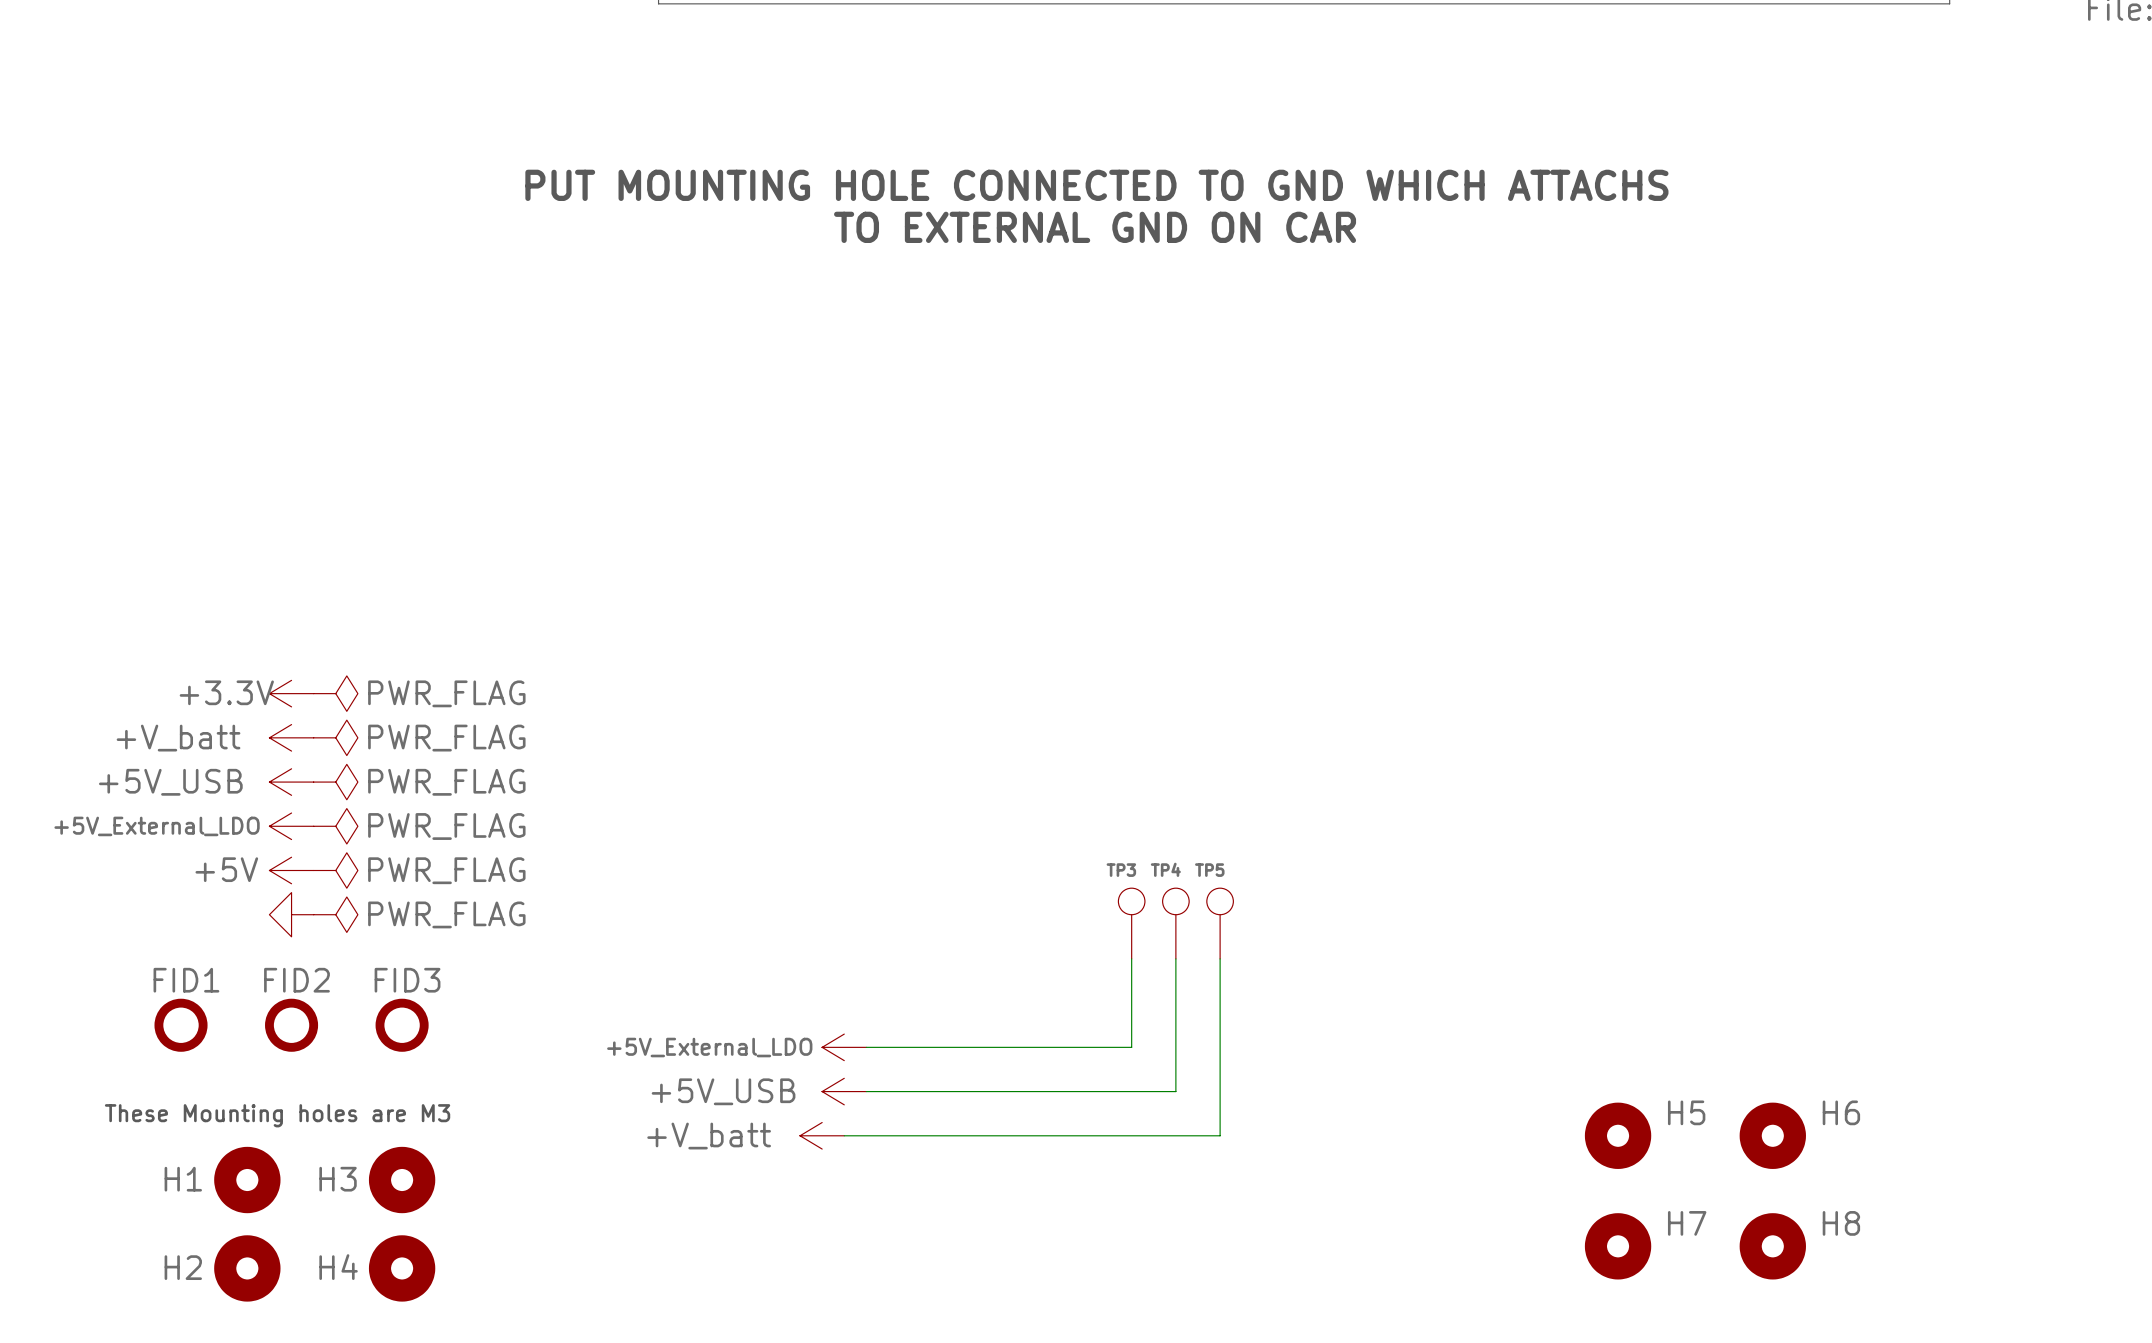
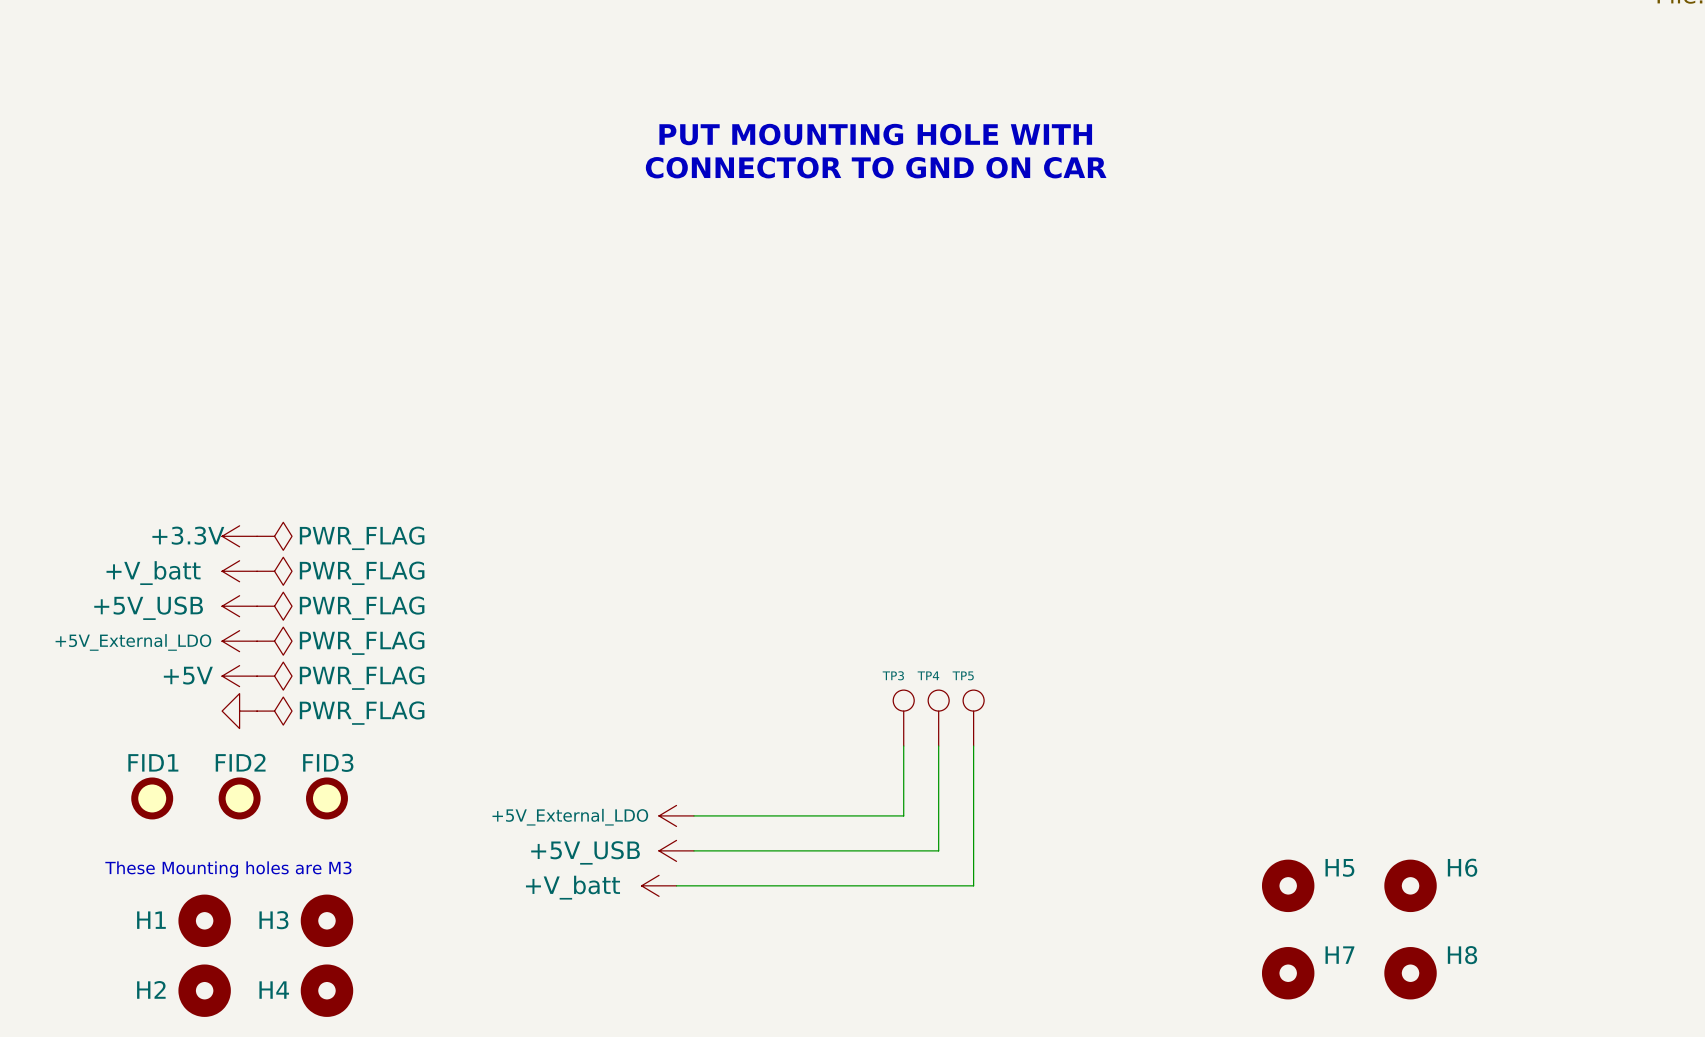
text: PUT MOUNTING HOLE CONNECTED TO GND WHICH ATTACHS (1096, 185) -> PUT MOUNTING HOLE WITH (875, 134)
text: TO EXTERNAL GND ON CAR (1095, 227) -> CONNECTOR TO GND ON CAR (876, 167)

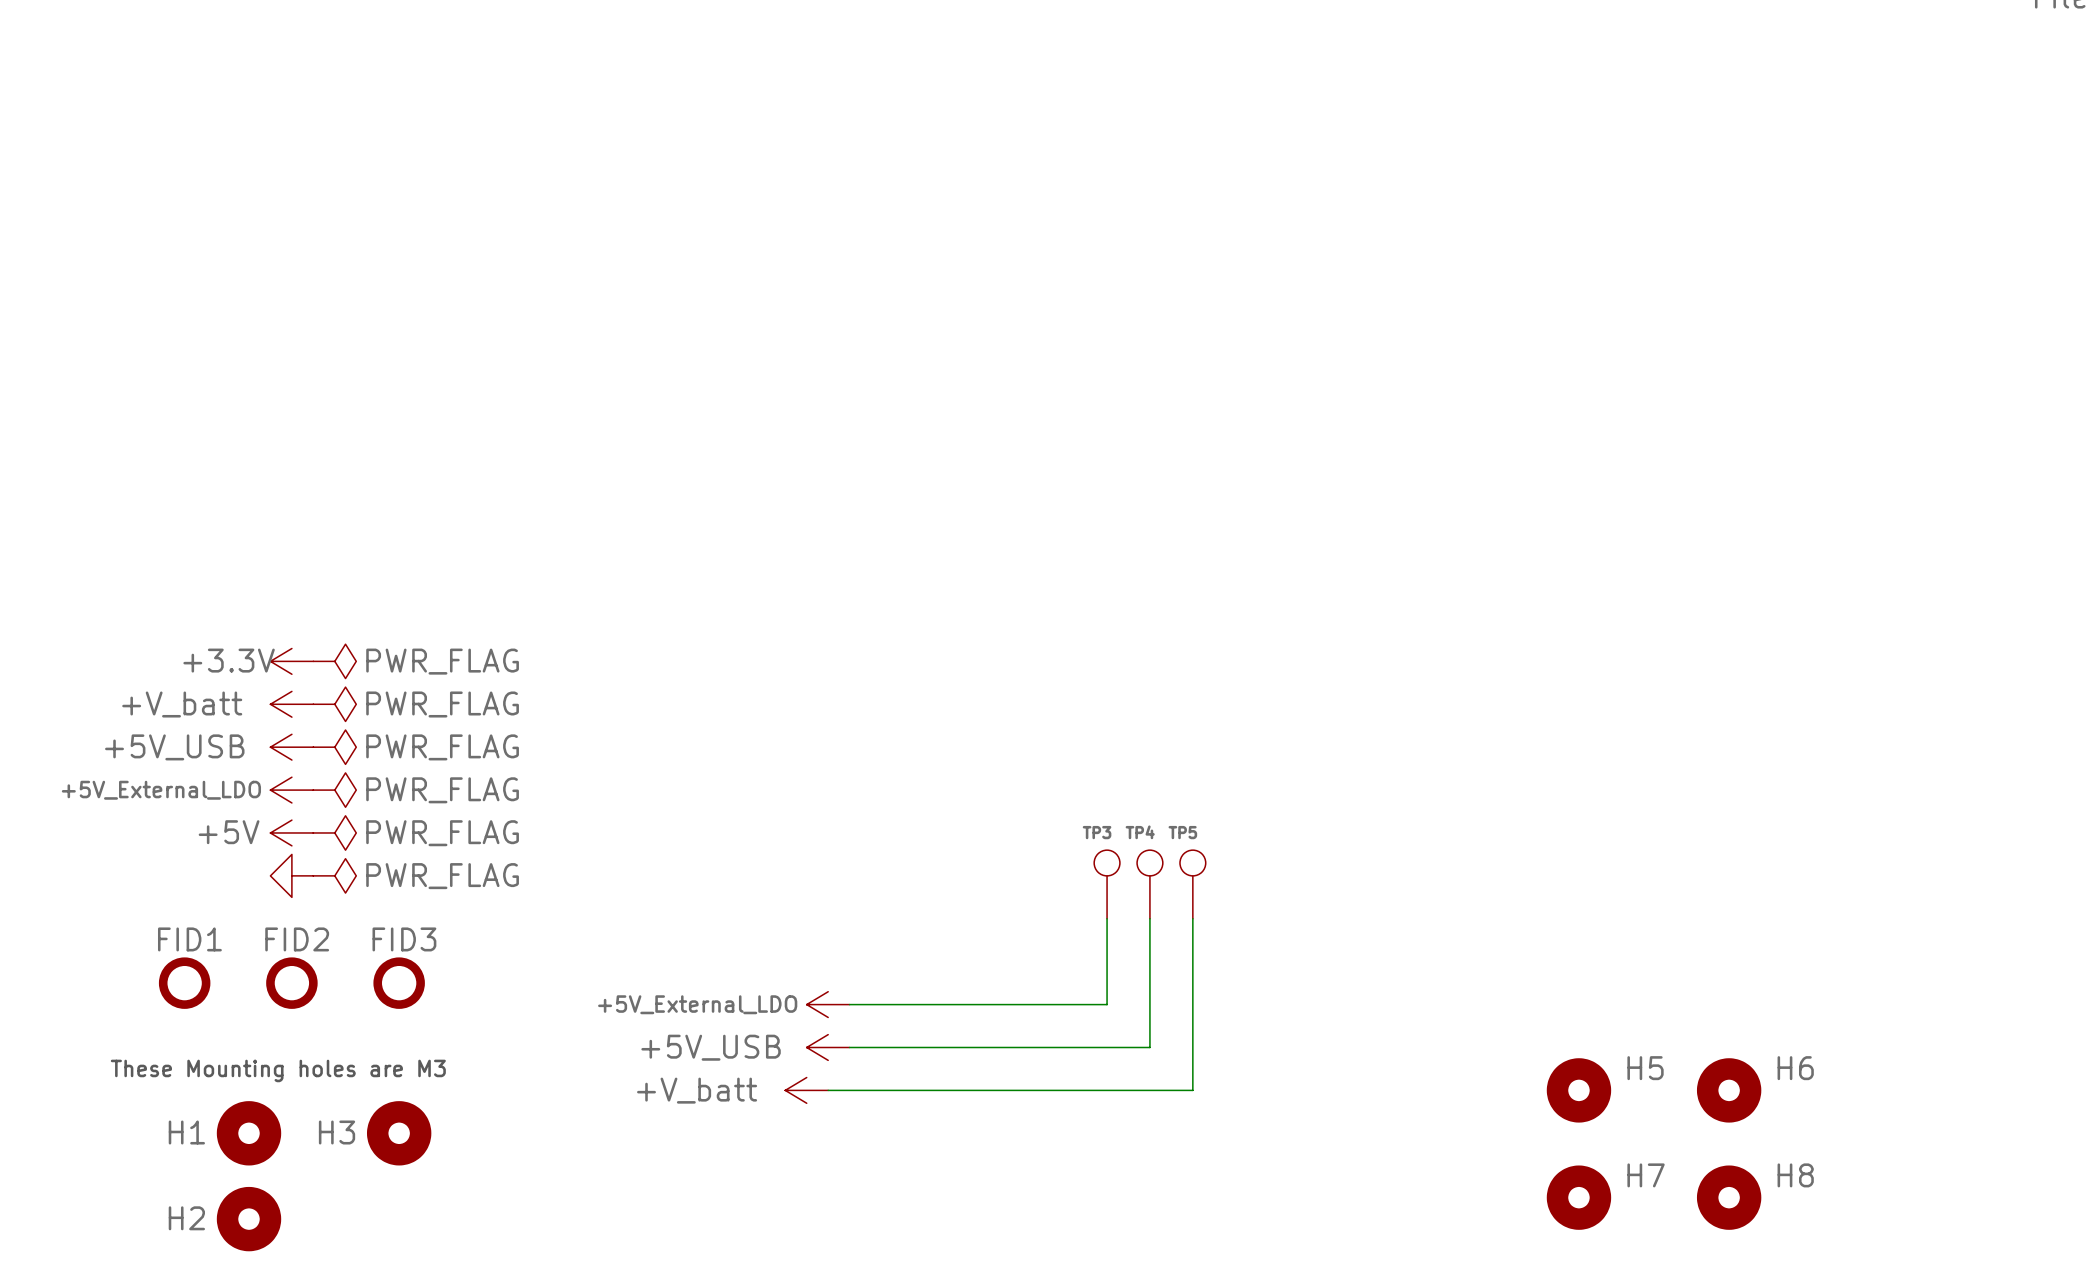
text: PUT MOUNTING HOLE WITH (875, 134) -> none
text: CONNECTOR TO GND ON CAR (876, 167) -> none
H4: (326, 990) -> none

